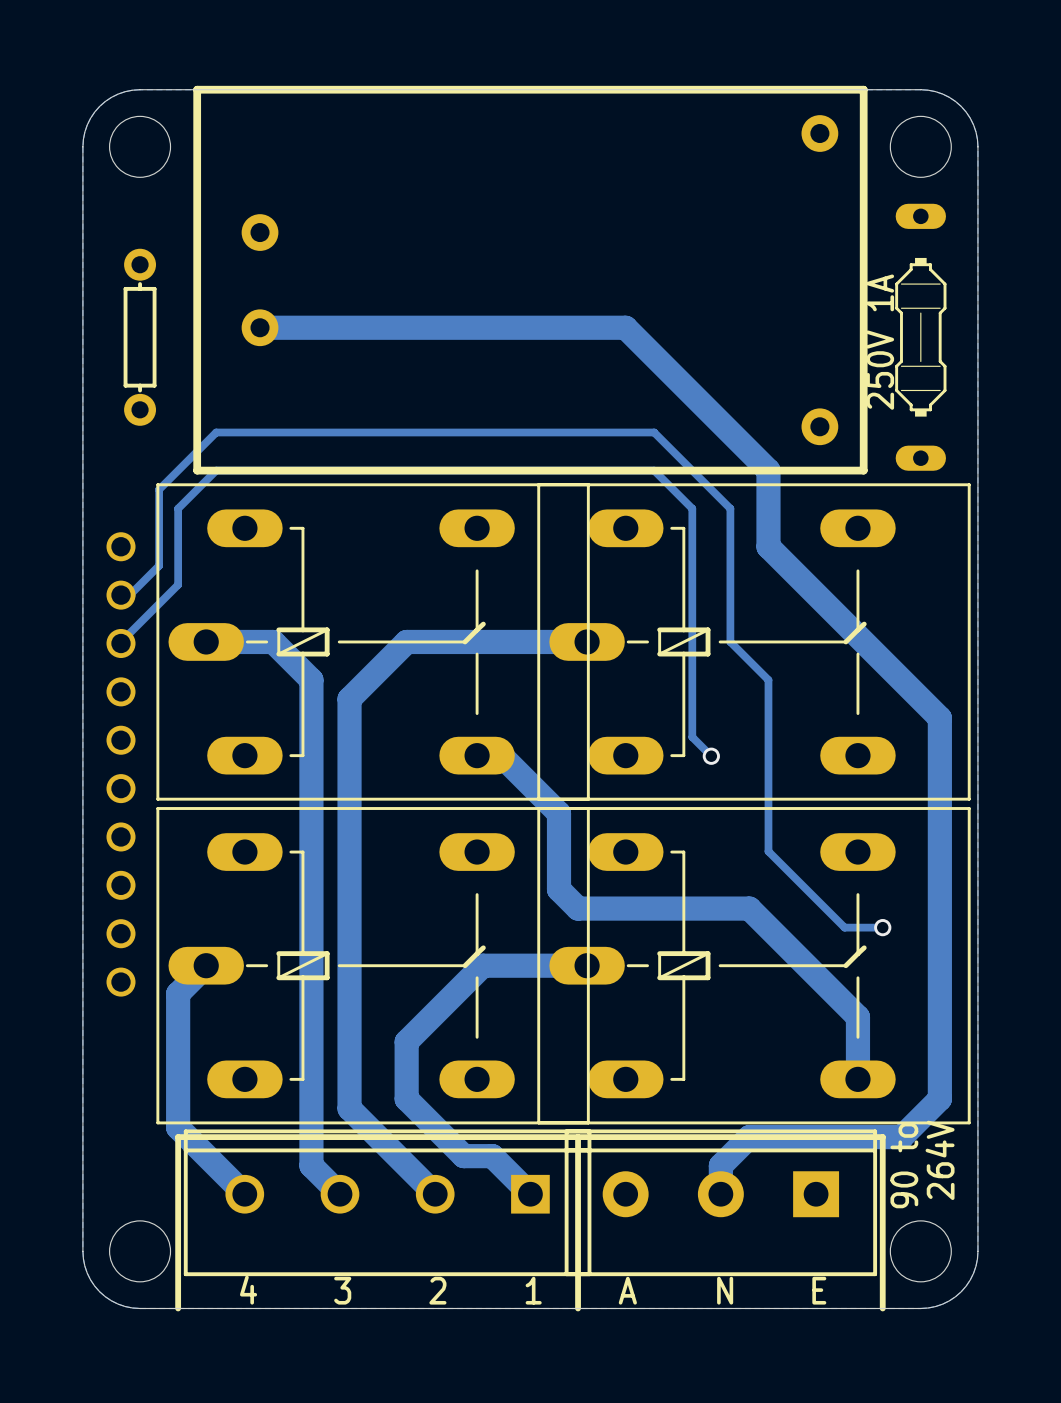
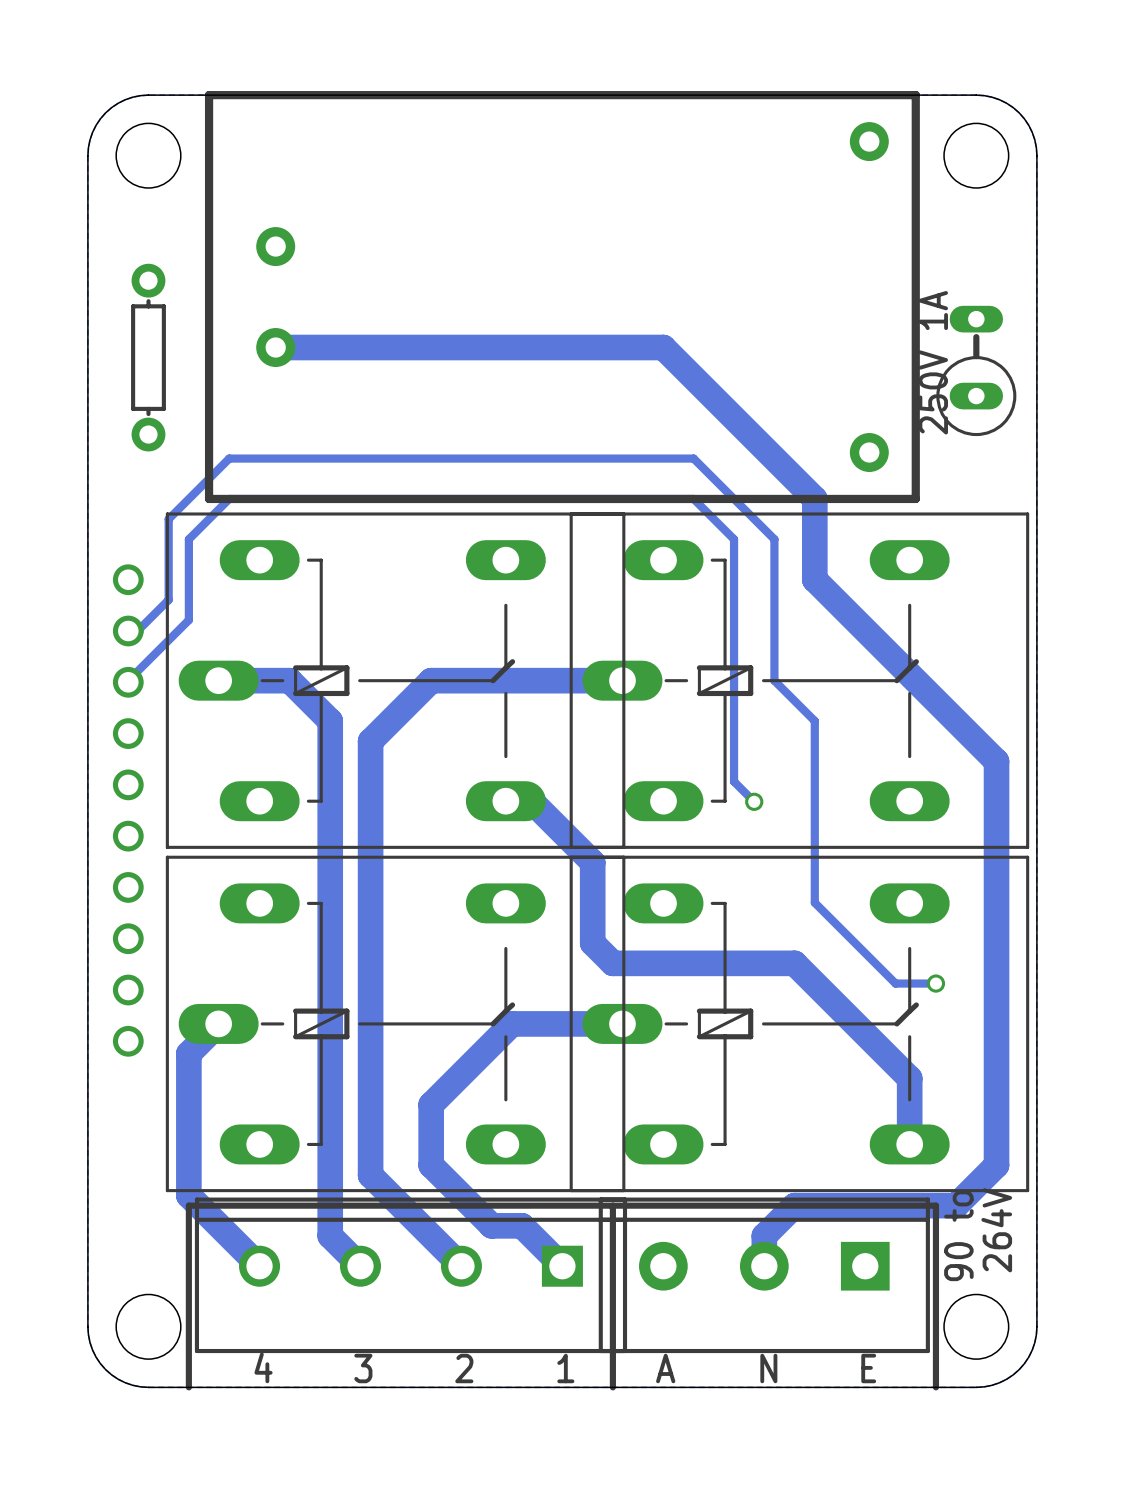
part footprint: [895, 203, 947, 471] -> [936, 305, 1017, 437]

